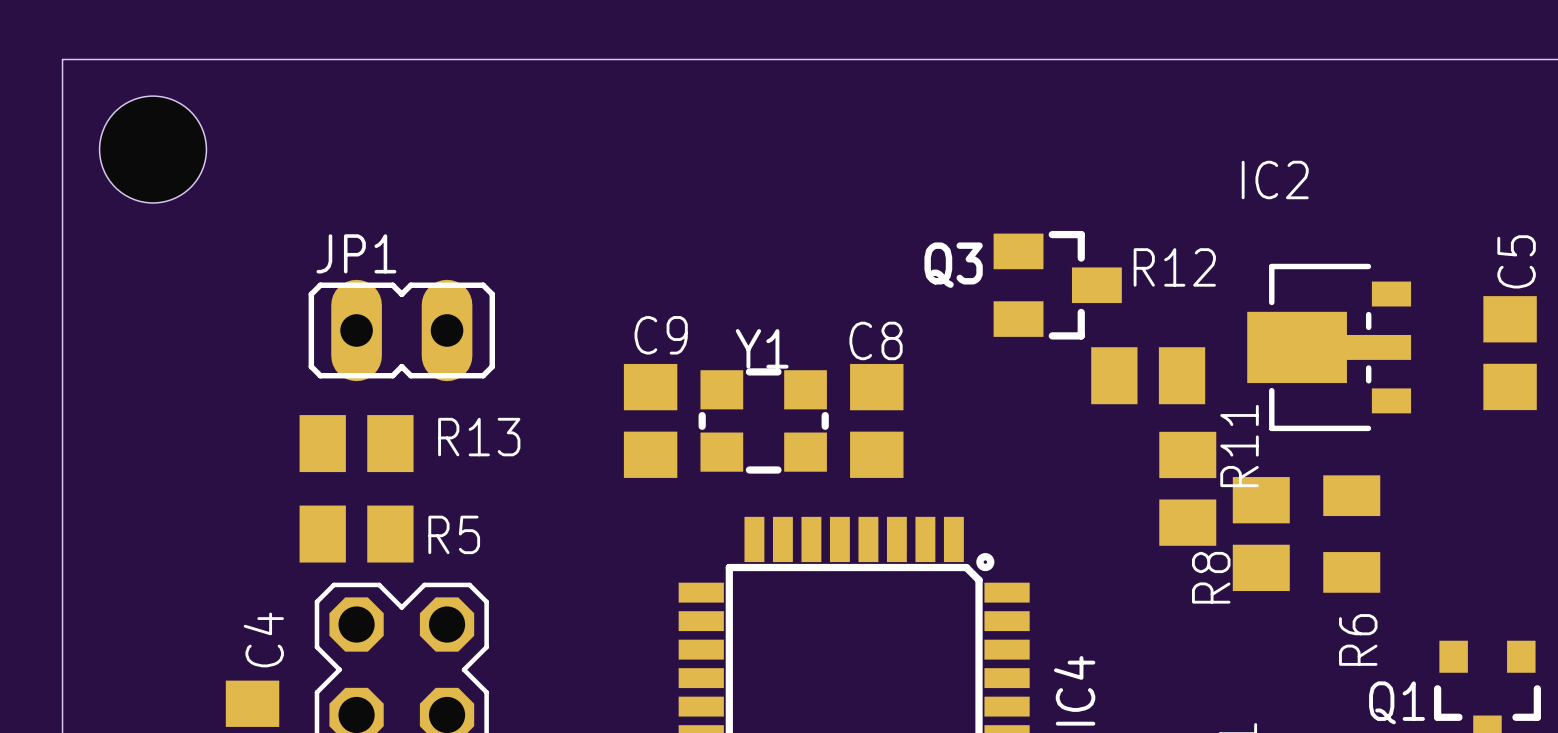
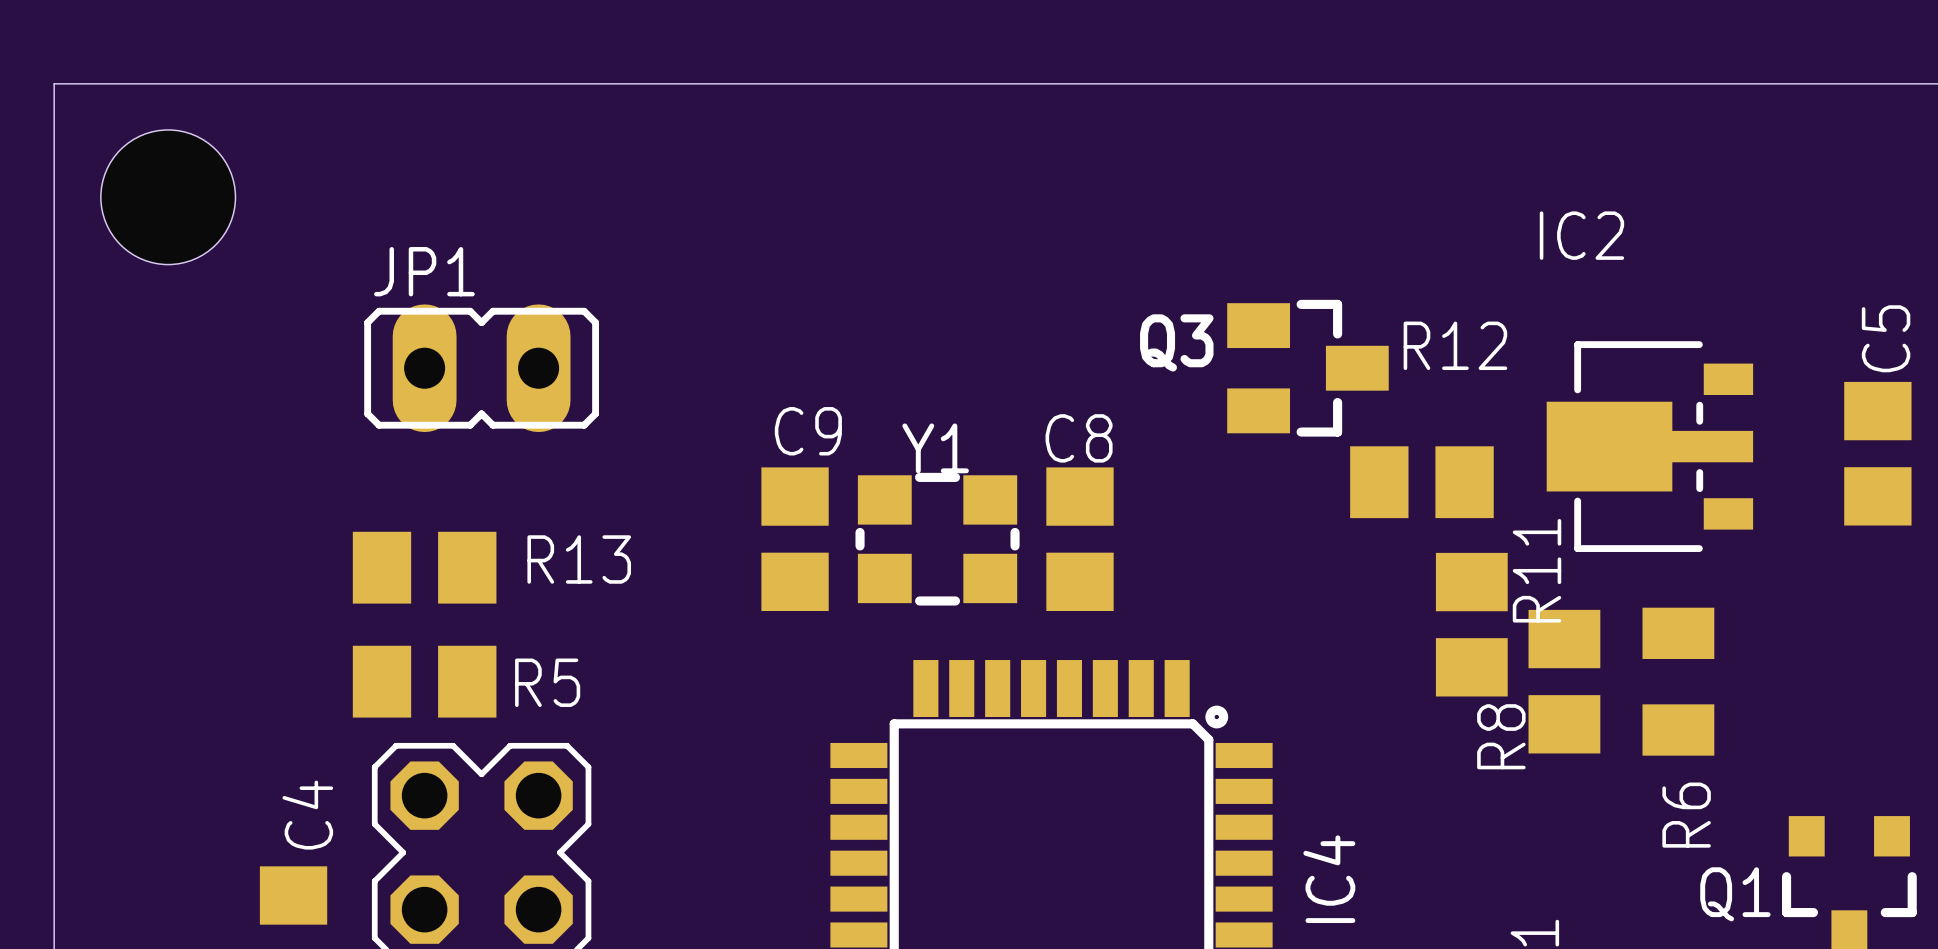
JP1 position: (401, 330) -> (481, 368)

